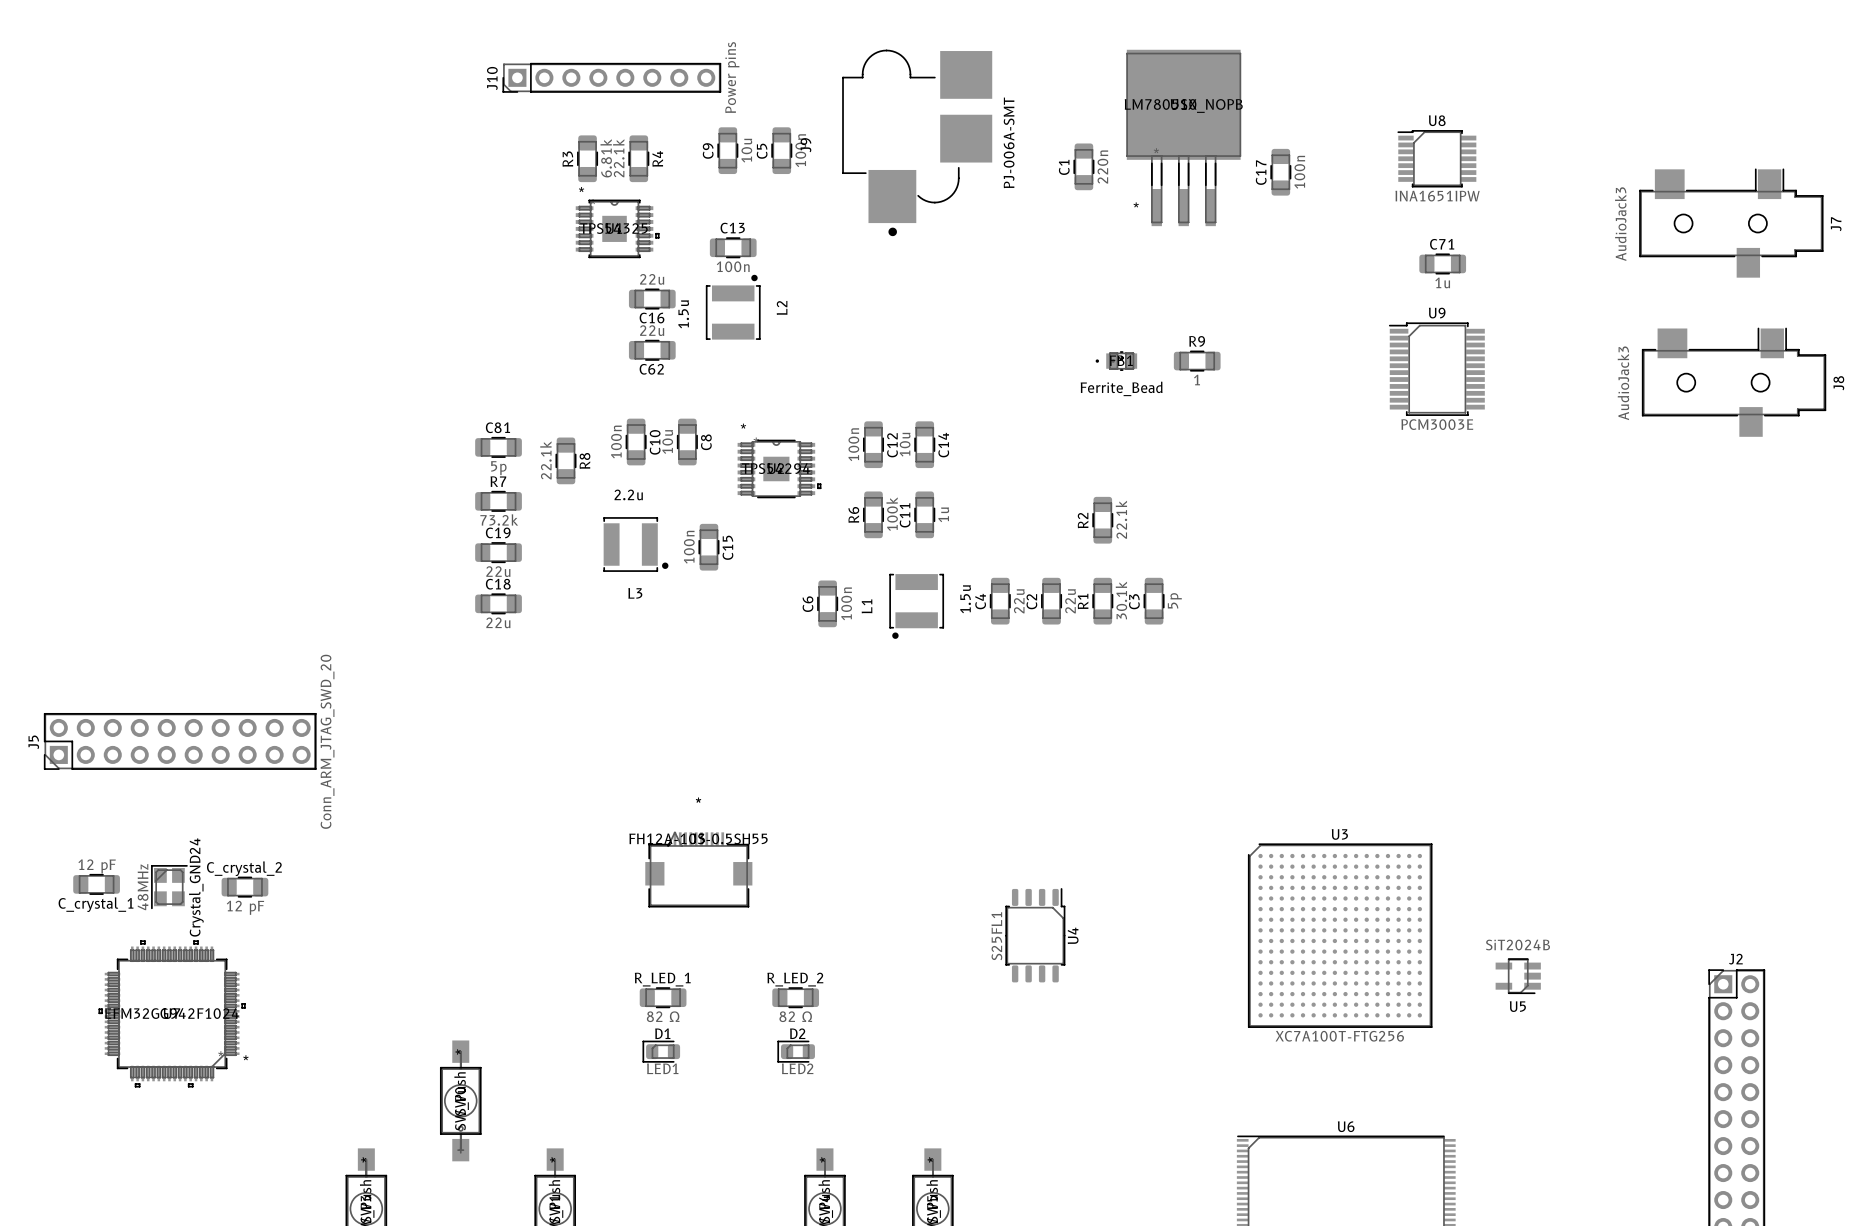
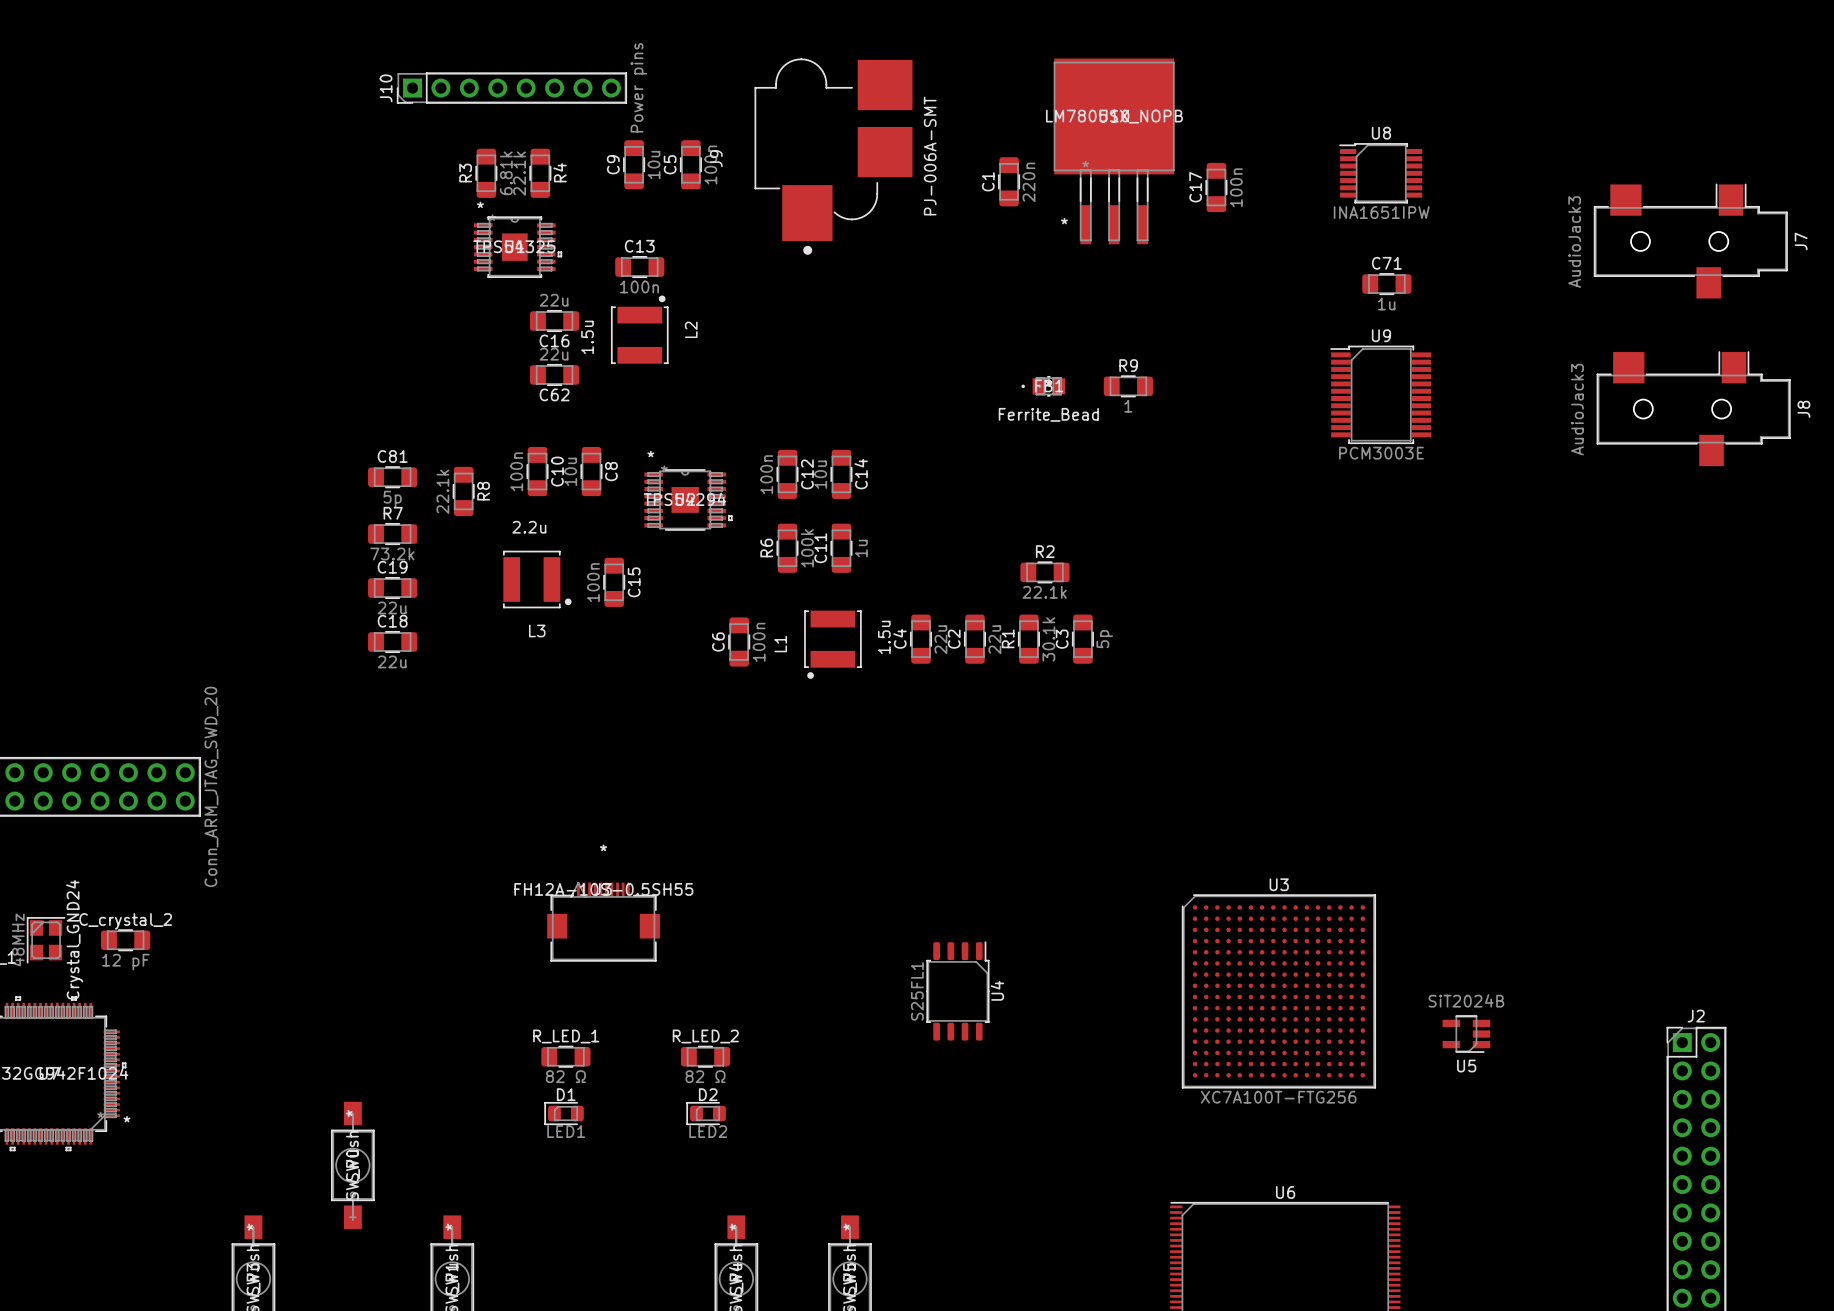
R2 rotation: 0° (1102, 520) -> 90° clockwise (1044, 572)

